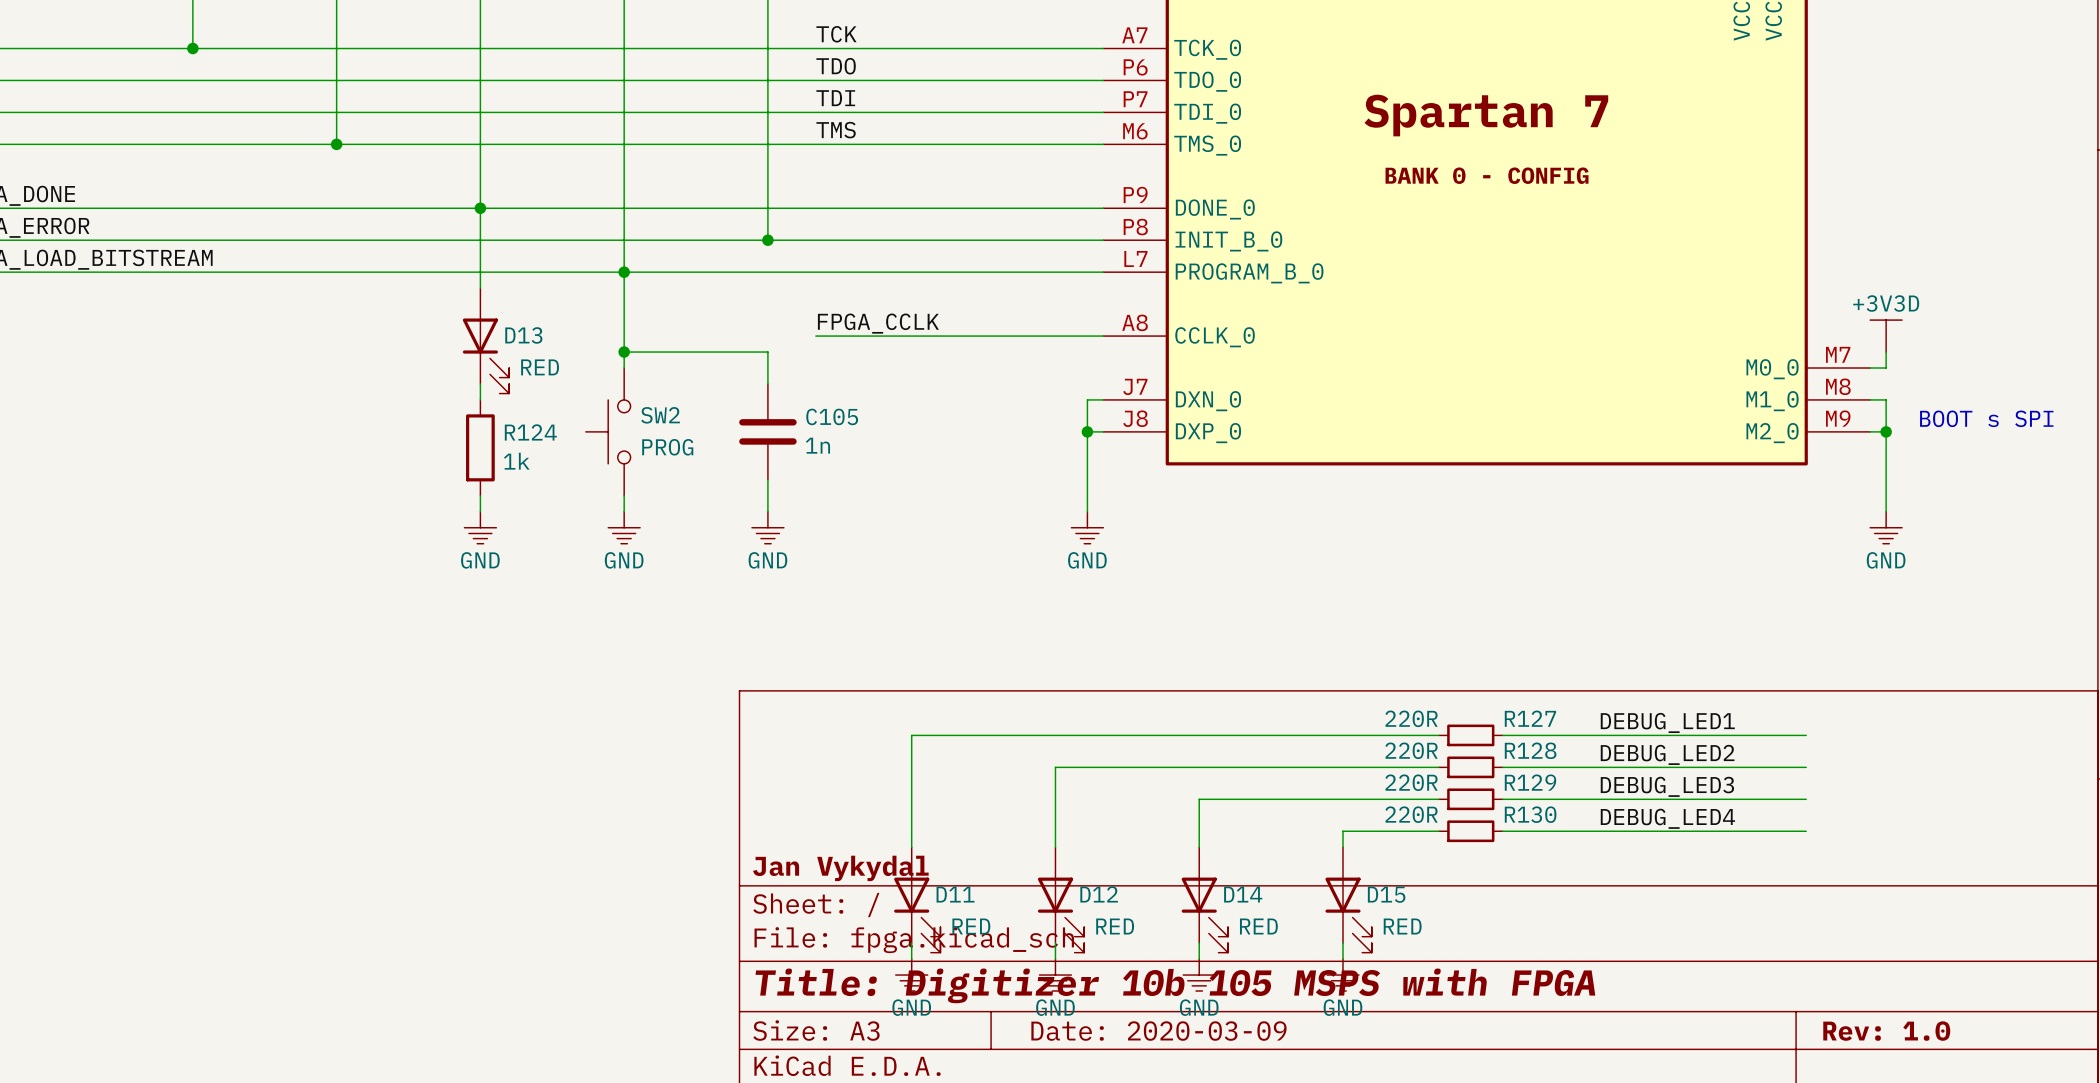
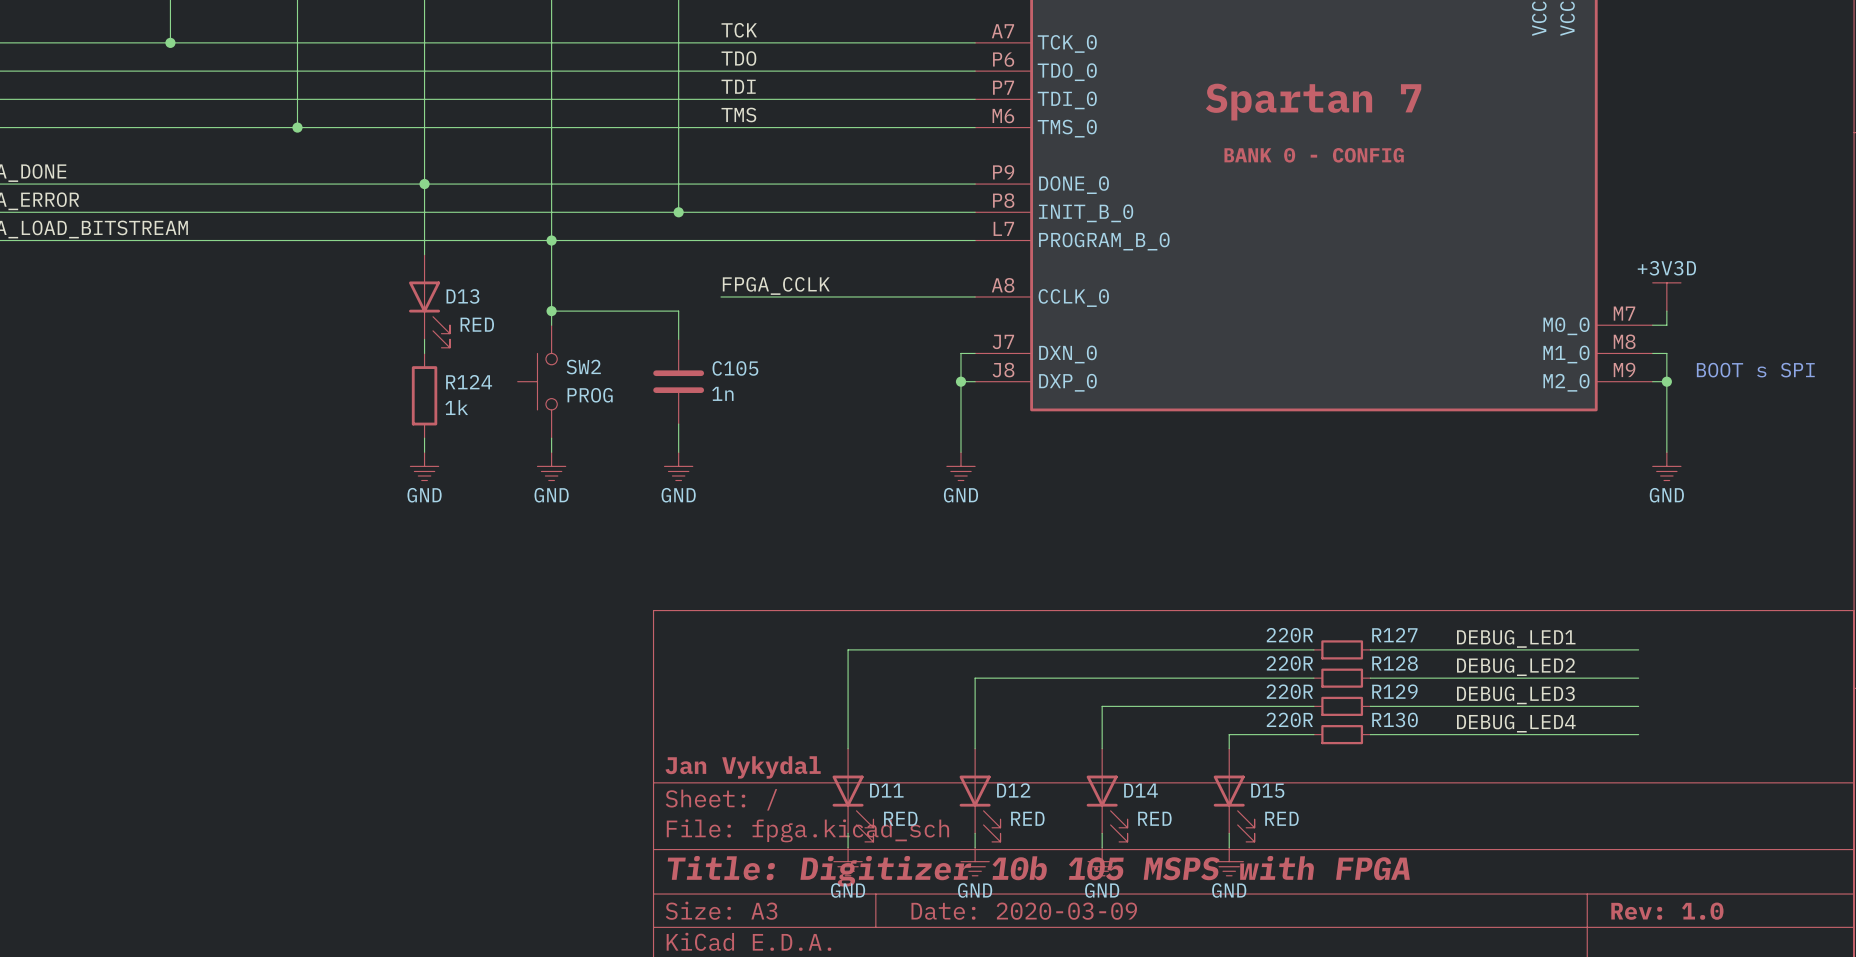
label position: DEBUG_LED1 (1667, 722) -> DEBUG_LED1 (1516, 638)
wire: (959, 735) (911, 735) (911, 847) -> (848, 649) (848, 748)
R127 position: (1470, 735) -> (1342, 649)
wire: (1502, 735) (1550, 735) -> (1271, 649) (1313, 649)
wire: none -> (1596, 649) (1638, 649)
label position: DEBUG_LED2 (1667, 754) -> DEBUG_LED2 (1516, 667)
wire: (1103, 767) (1055, 767) (1055, 847) -> (975, 678) (975, 748)
R128 position: (1470, 767) -> (1342, 678)
wire: (1502, 767) (1550, 767) -> (1271, 678) (1313, 678)
wire: none -> (1596, 678) (1638, 678)
label position: DEBUG_LED3 (1667, 786) -> DEBUG_LED3 (1515, 695)
wire: (1247, 799) (1199, 799) (1199, 847) -> (1102, 706) (1102, 748)
R129 position: (1470, 799) -> (1342, 706)
wire: (1502, 799) (1550, 799) -> (1271, 706) (1313, 706)
wire: none -> (1596, 706) (1638, 706)
label position: DEBUG_LED4 (1667, 818) -> DEBUG_LED4 (1516, 723)
wire: (1390, 831) (1343, 831) (1343, 847) -> (1229, 734) (1229, 748)
R130 position: (1470, 831) -> (1342, 734)
wire: (1502, 831) (1550, 831) -> (1271, 734) (1313, 734)
wire: none -> (1596, 734) (1638, 734)
D11 position: (917, 899) -> (853, 795)
D12 position: (1061, 899) -> (980, 795)
D14 position: (1204, 899) -> (1107, 795)
D15 position: (1348, 899) -> (1234, 795)
wire: (911, 943) (911, 959) -> (848, 833) (848, 847)
wire: (1055, 943) (1055, 959) -> (975, 833) (975, 847)
wire: (1199, 943) (1199, 959) -> (1102, 833) (1102, 847)
wire: (1343, 943) (1343, 959) -> (1229, 833) (1229, 847)
power symbol: GND (911, 975) -> none
power symbol: none -> GND (848, 861)
power symbol: GND (1055, 975) -> none
power symbol: none -> GND (975, 861)
power symbol: GND (1199, 975) -> none
power symbol: none -> GND (1102, 861)
power symbol: GND (1343, 975) -> none
power symbol: none -> GND (1229, 861)

